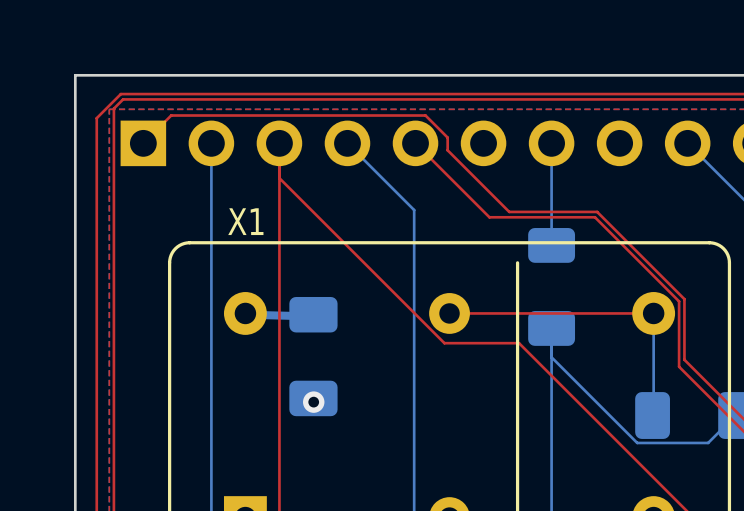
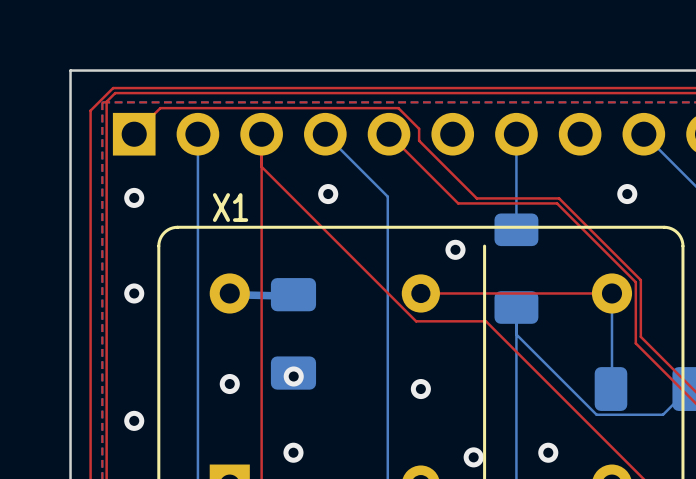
via: none -> (328, 194)
via: none -> (627, 194)
via: none -> (134, 197)
via: none -> (455, 249)
via: none -> (134, 293)
via: none -> (229, 384)
via: none -> (420, 389)
via: none -> (134, 420)
via: none -> (293, 452)
via: none -> (548, 452)
via: none -> (473, 457)

